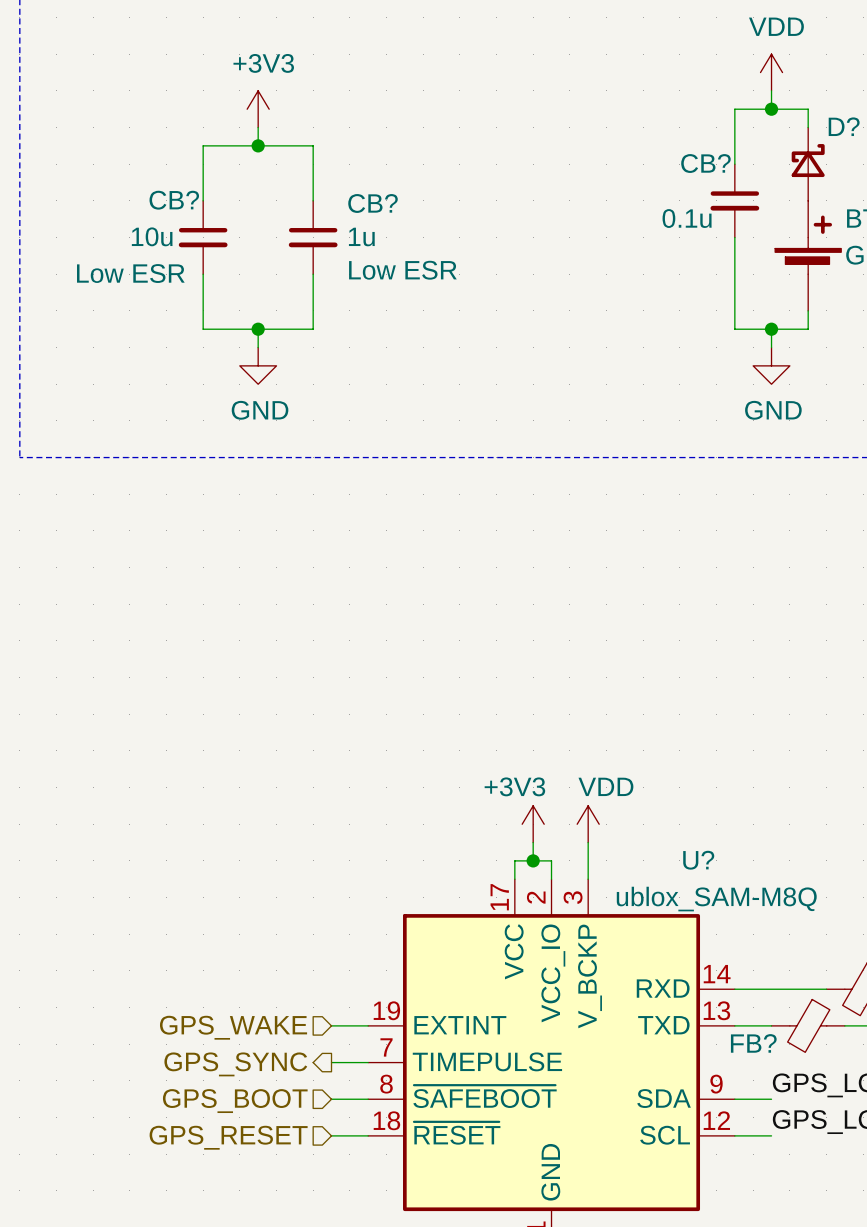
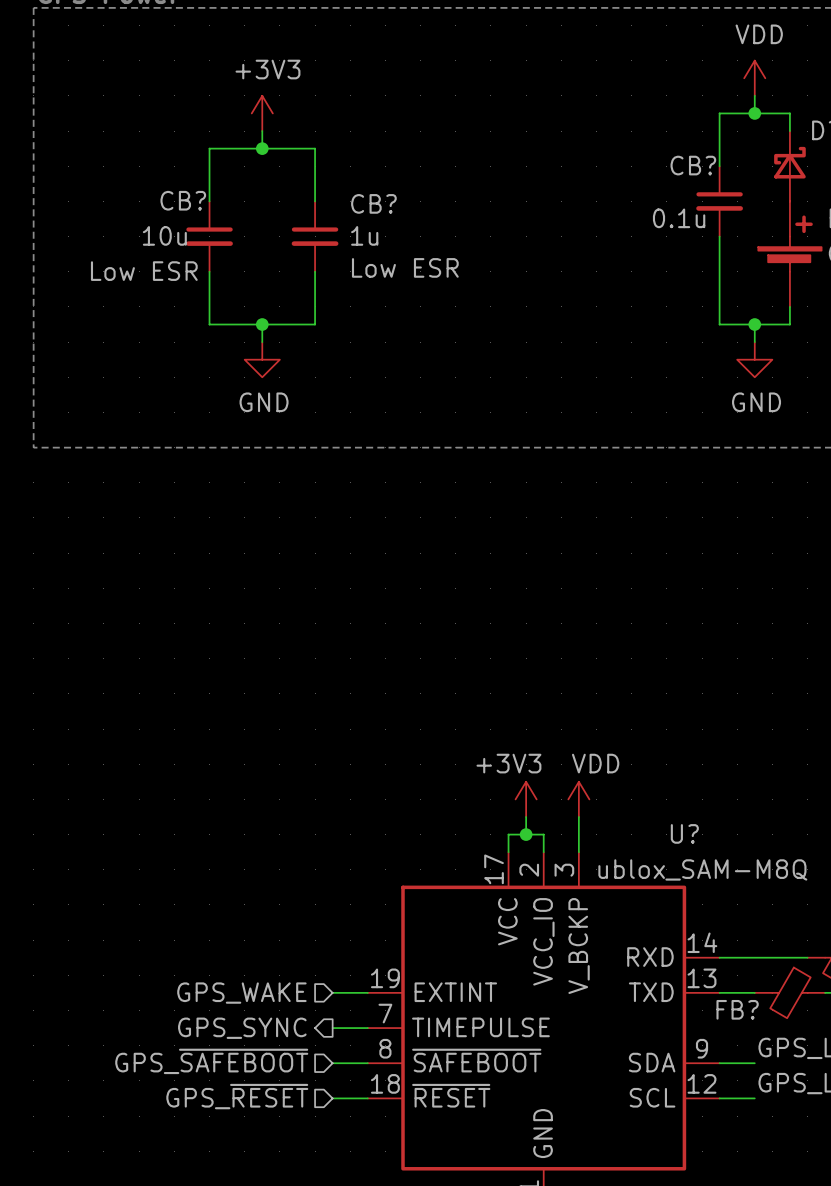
hierarchical label: GPS_BOOT (235, 1101) -> GPS_~{SAFEBOOT} (211, 1061)
hierarchical label: GPS_RESET (228, 1137) -> GPS_~{RESET} (237, 1096)

